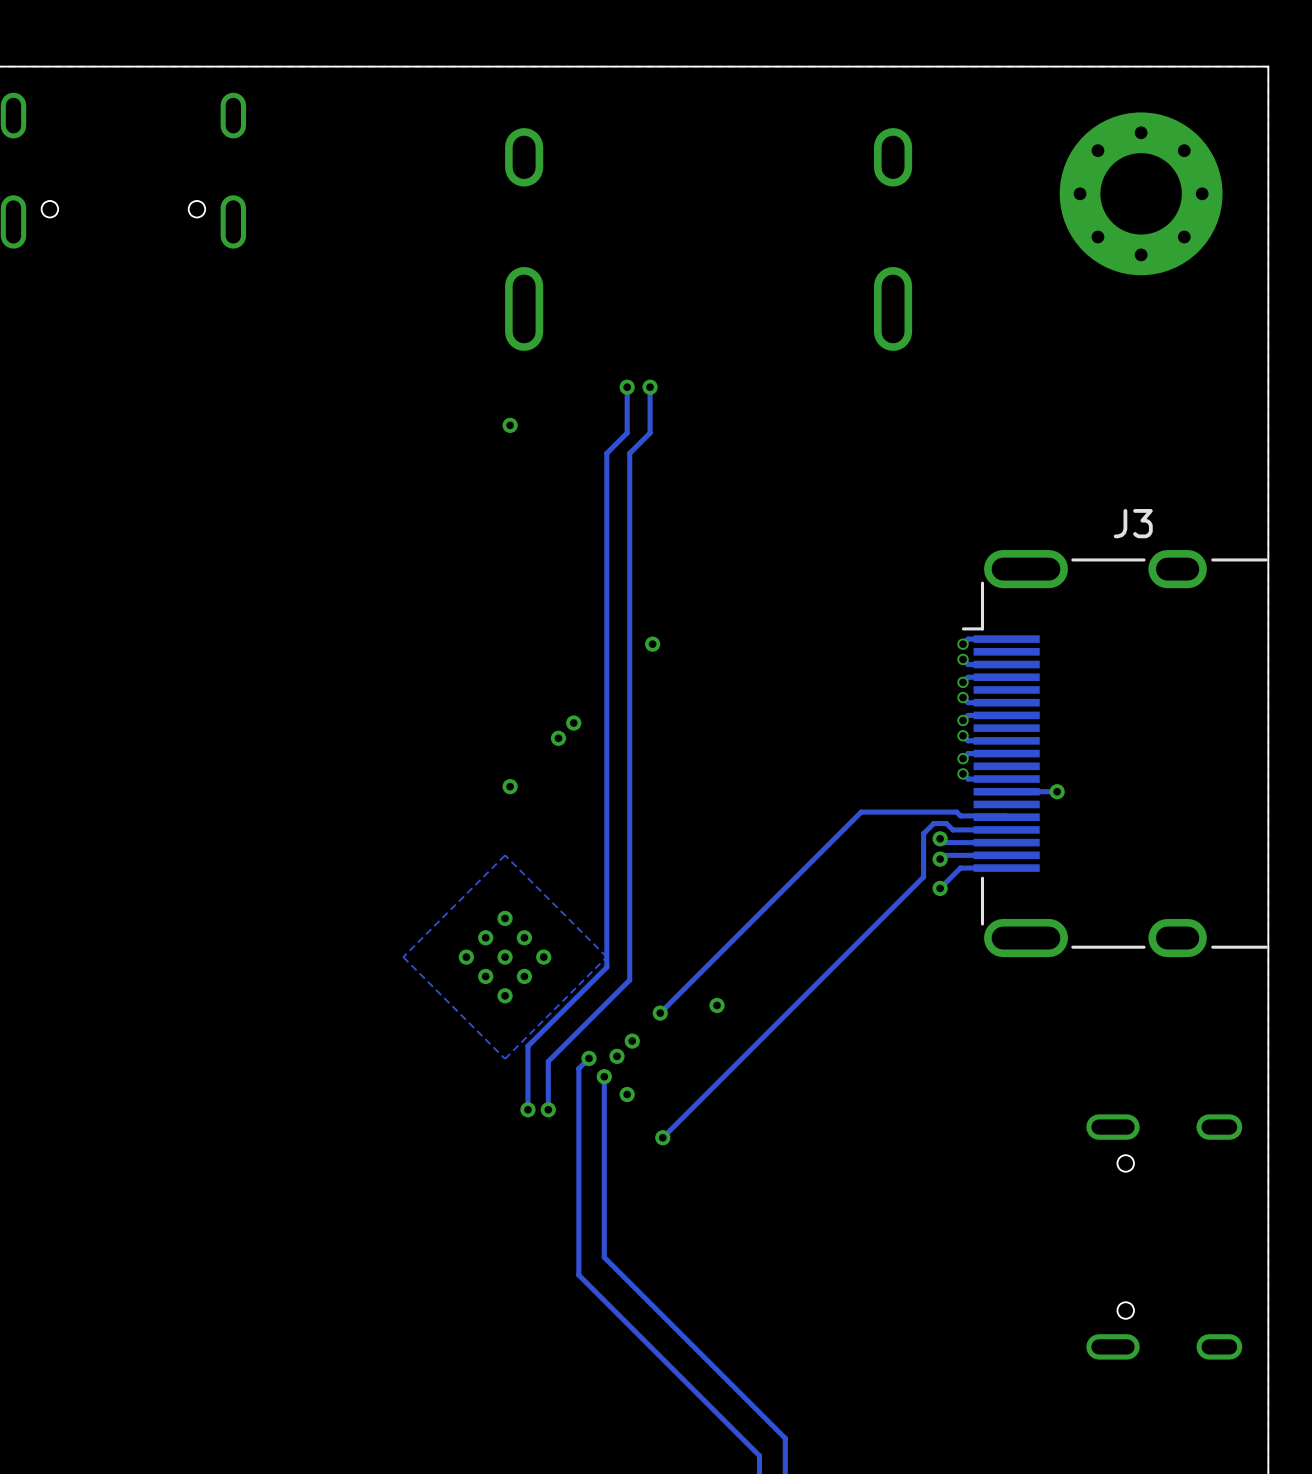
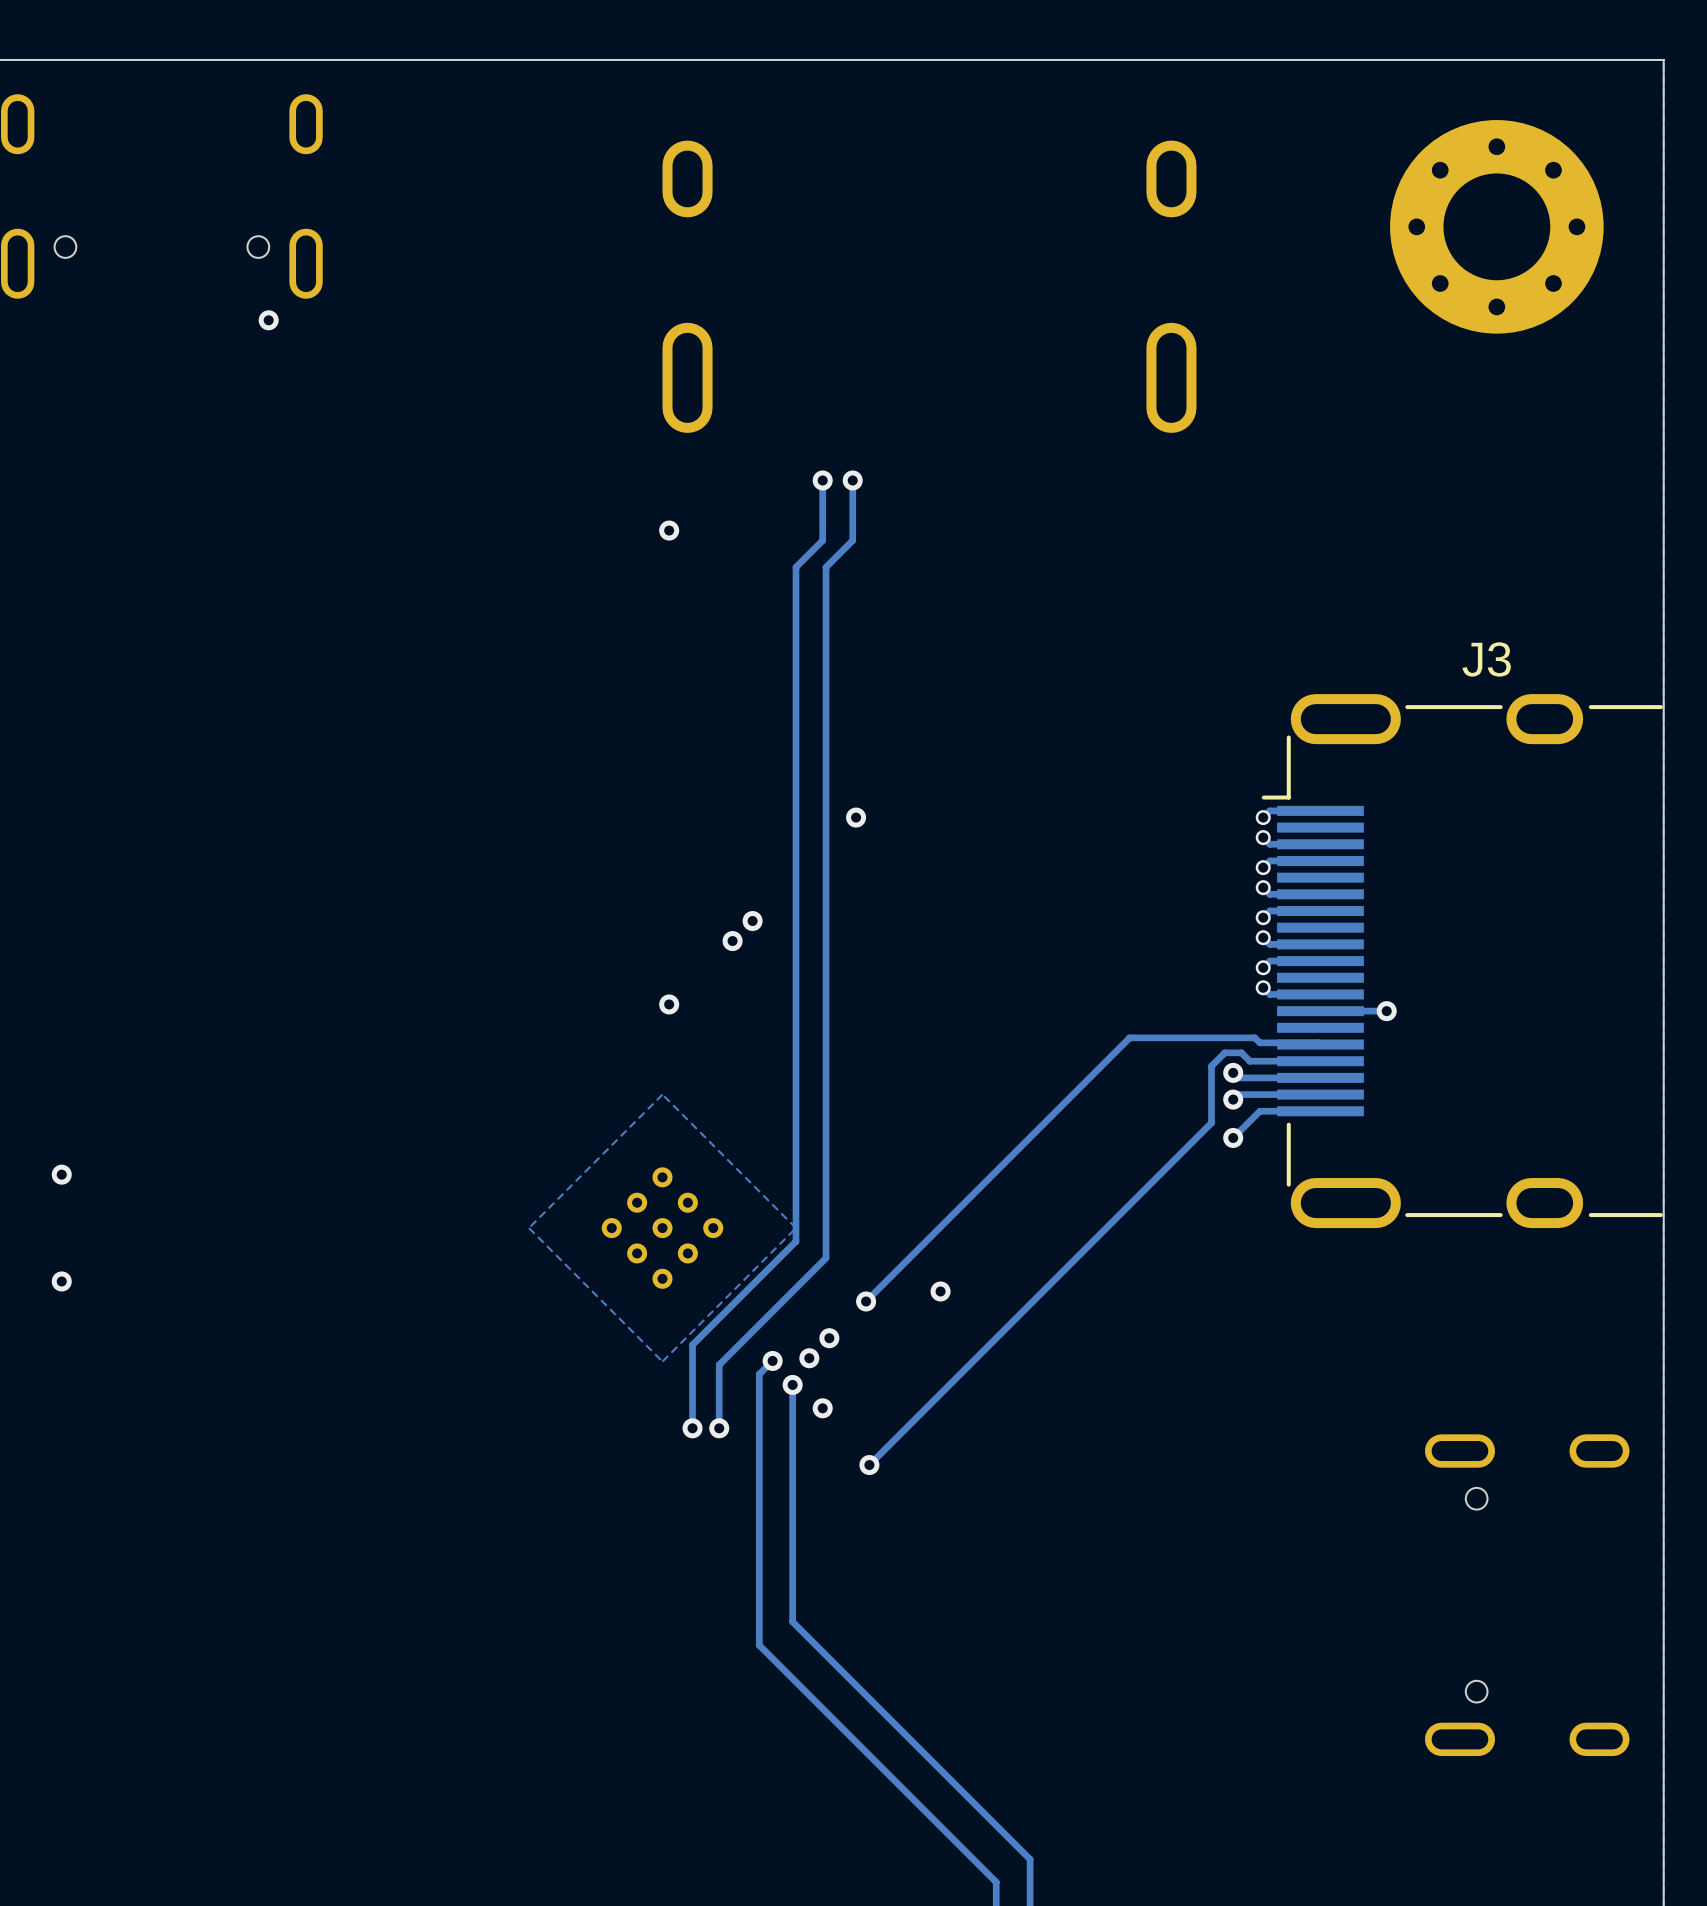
via: none -> (268, 320)
via: none -> (61, 1174)
via: none -> (61, 1281)

